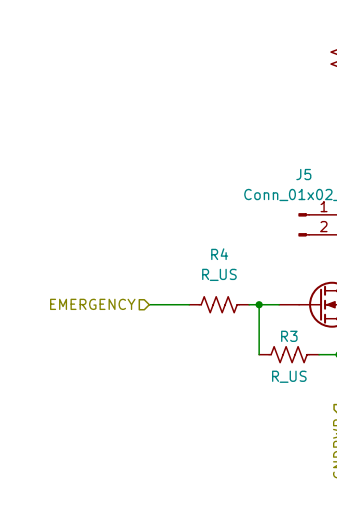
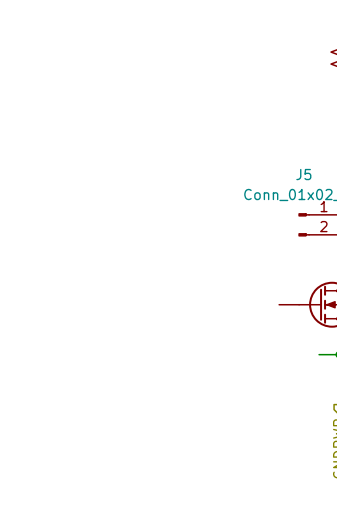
hierarchical label: EMERGENCY (92, 304) -> none
wire: (149, 304) (189, 304) -> none
R4: R_US (219, 304) -> none
wire: (249, 304) (279, 304) -> none
wire: (259, 304) (259, 354) -> none
junction: (259, 304) -> none
R3: R_US (289, 354) -> none

